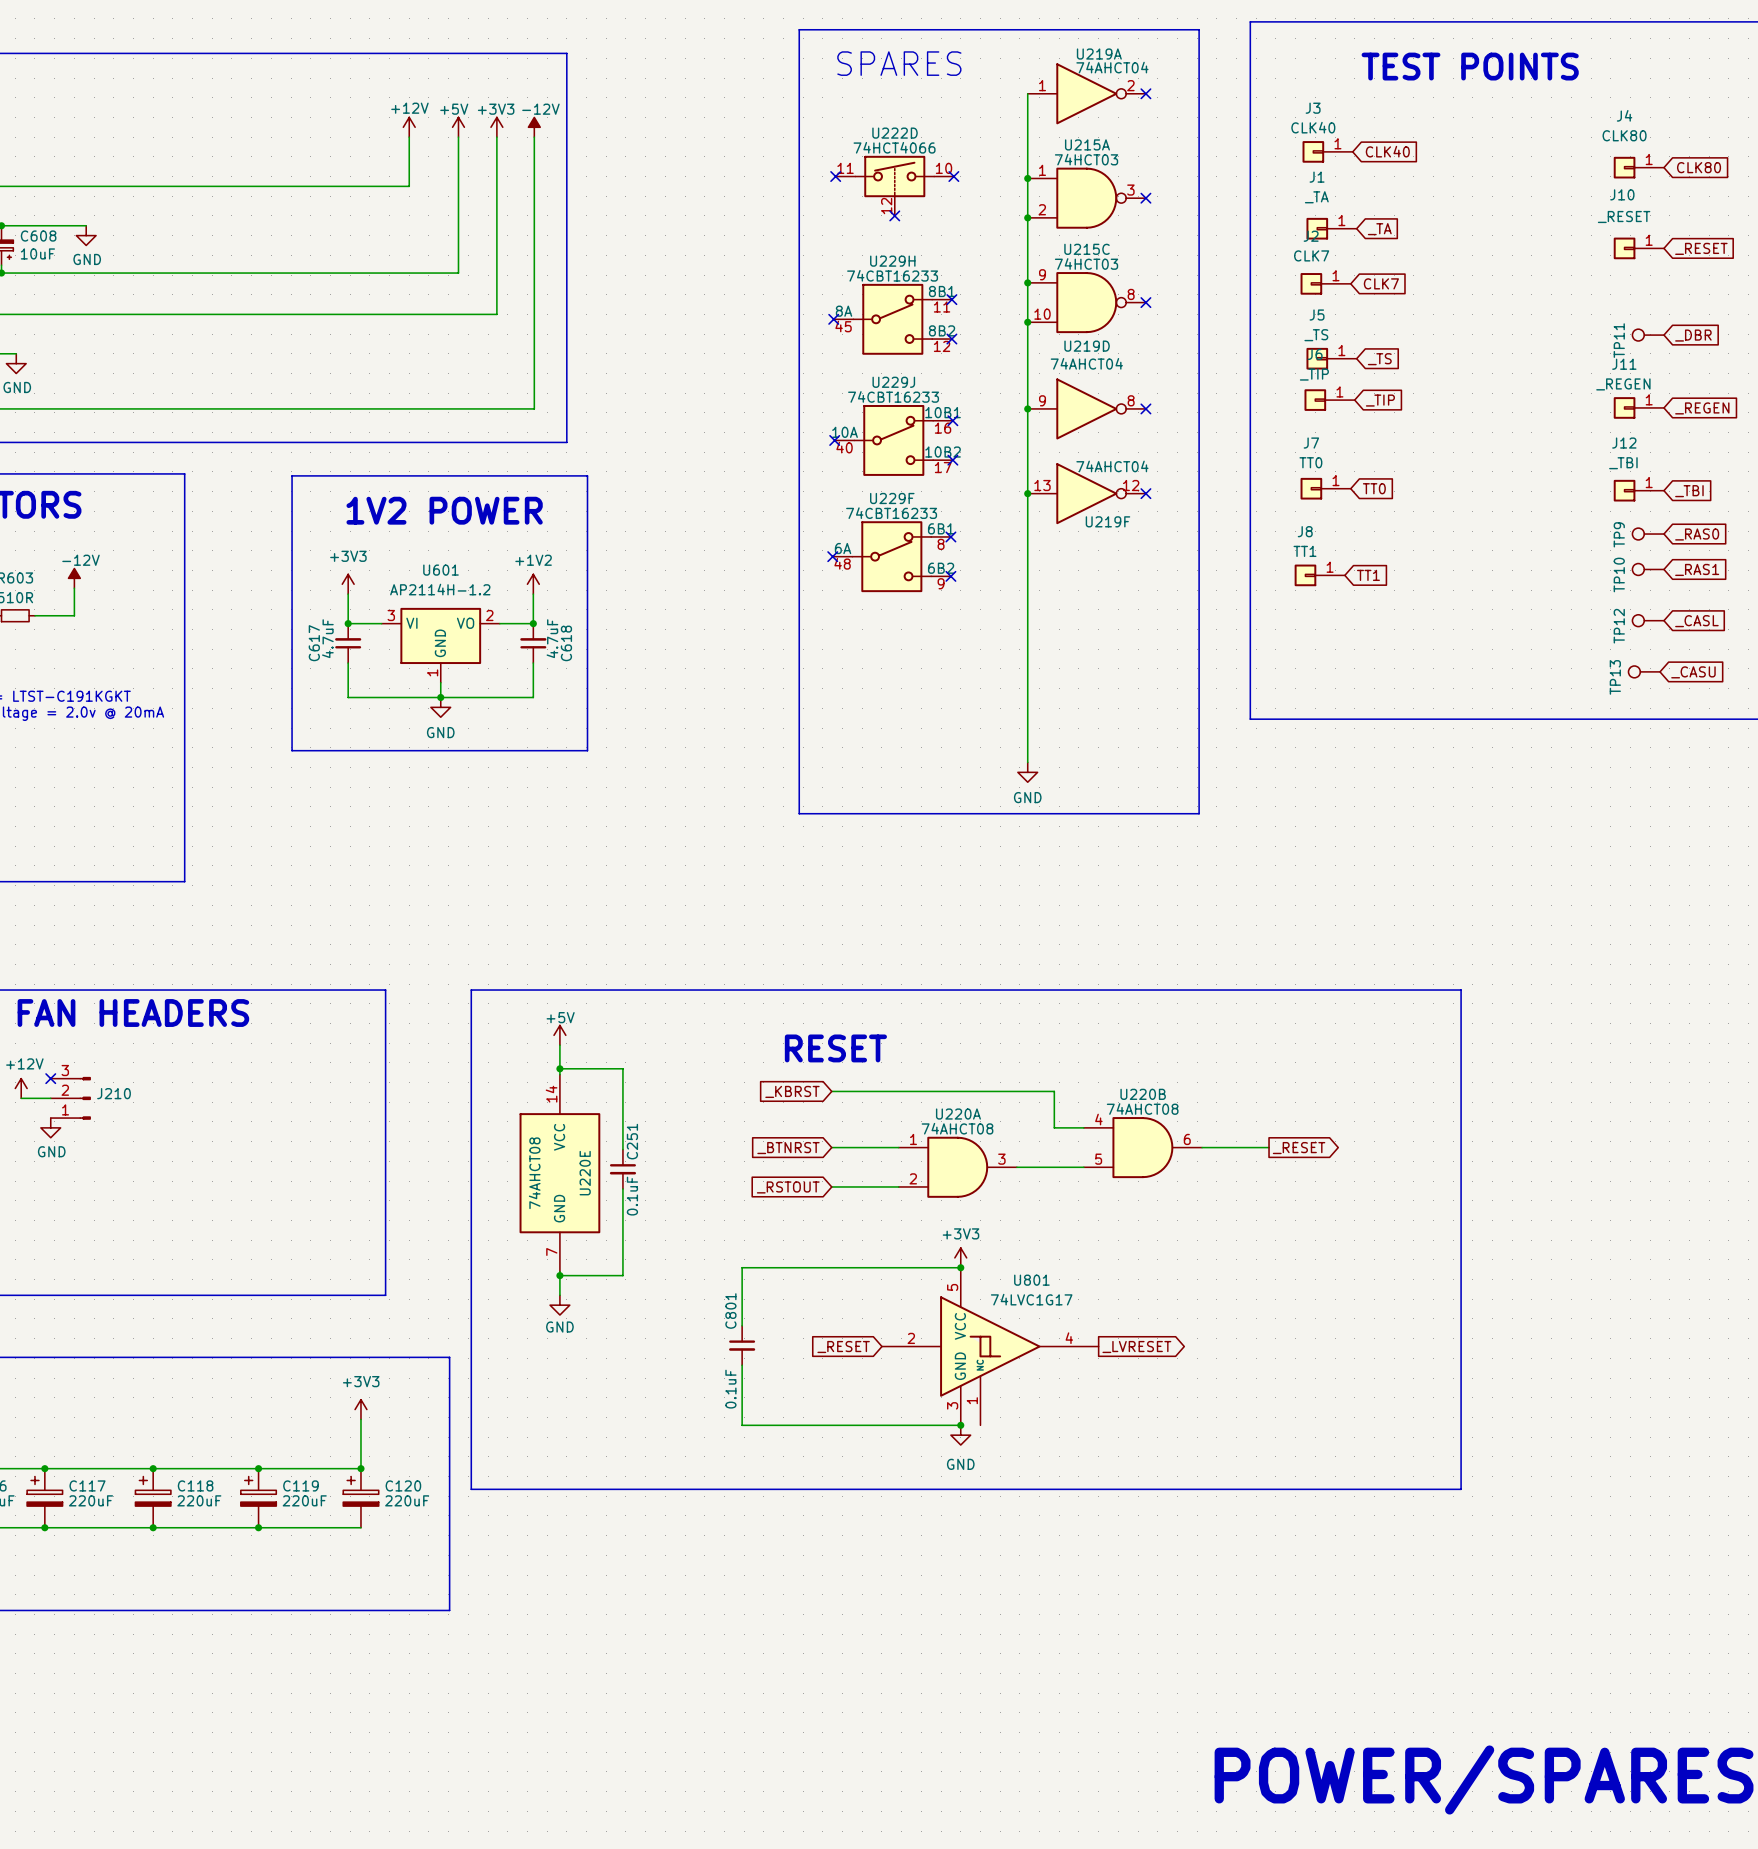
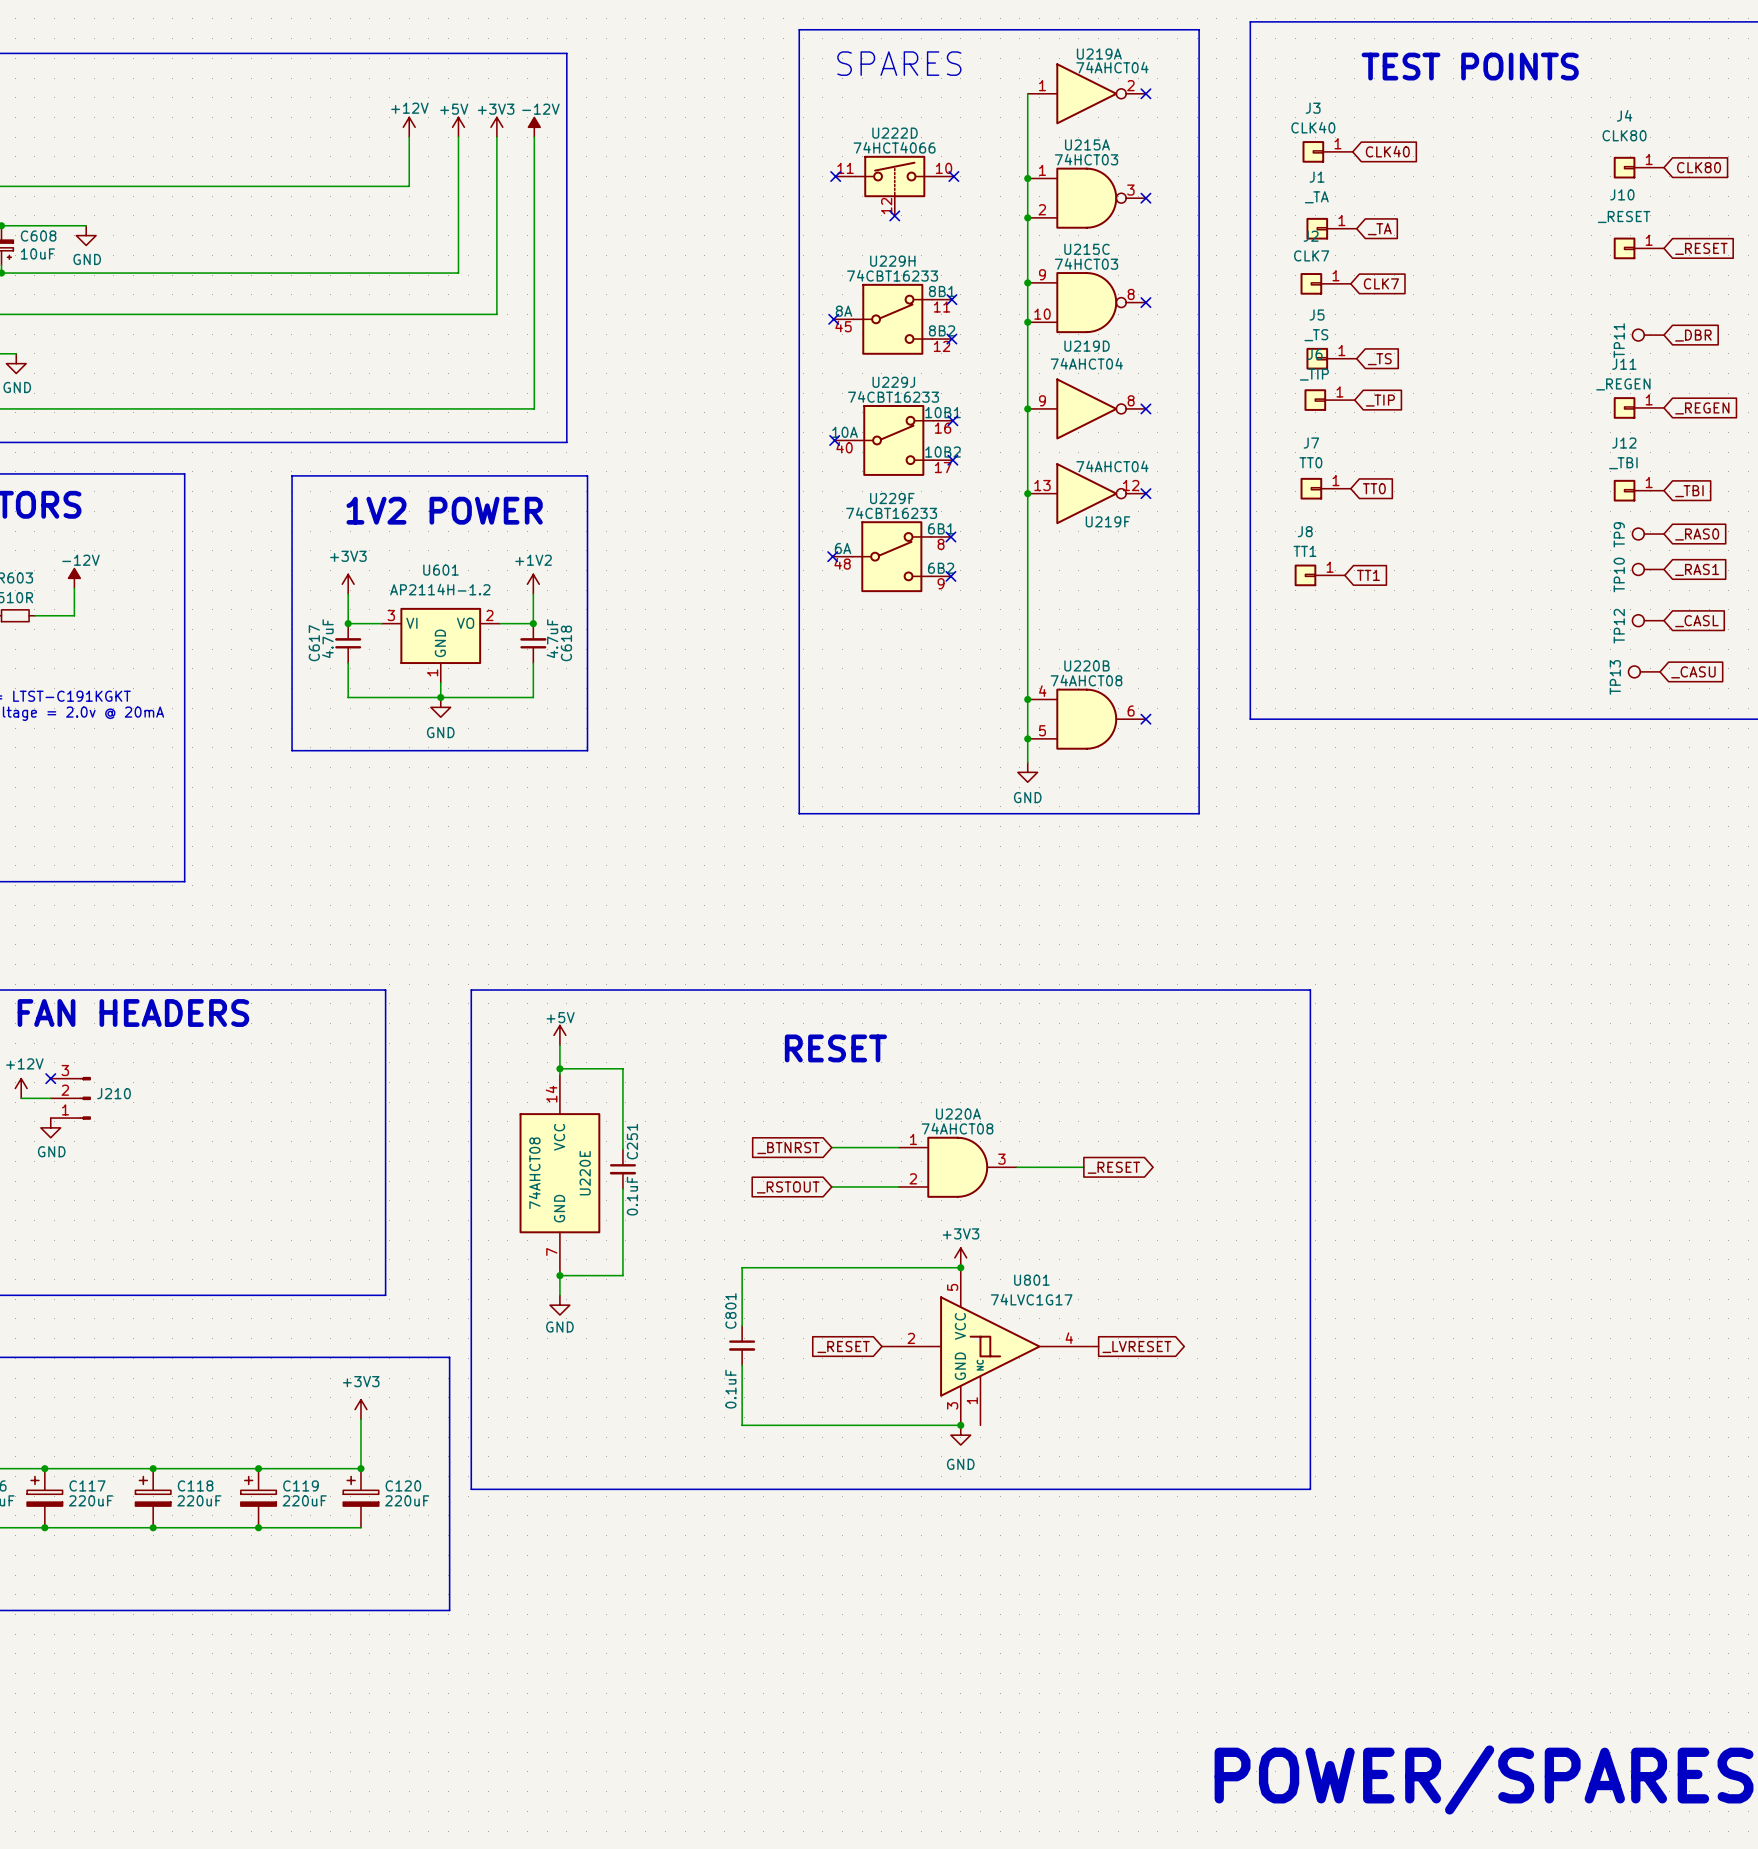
junction: none -> (1027, 699)
no-connect mark: none -> (1145, 719)
junction: none -> (1027, 738)
line: (1310, 990) (1461, 990) (1461, 1489) (1310, 1489) -> (1310, 990) (1310, 1489)
global label: _KBRST (792, 1091) -> none
wire: (831, 1091) (1054, 1091) (1054, 1127) (1083, 1127) -> none
U220B position: (1142, 1147) -> (1086, 719)
wire: (1202, 1147) (1269, 1147) -> none
global label position: _RESET (1299, 1148) -> _RESET (1113, 1167)

